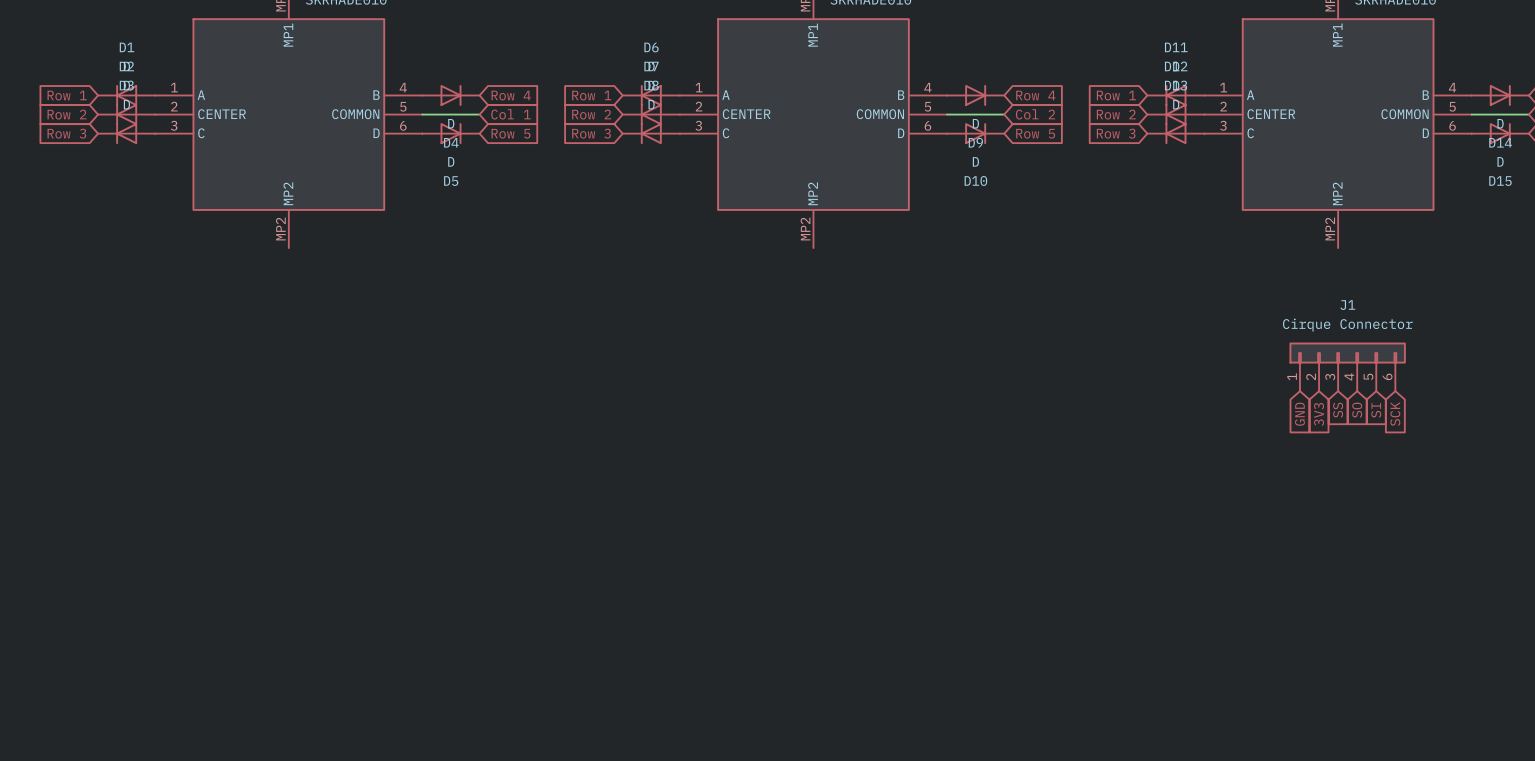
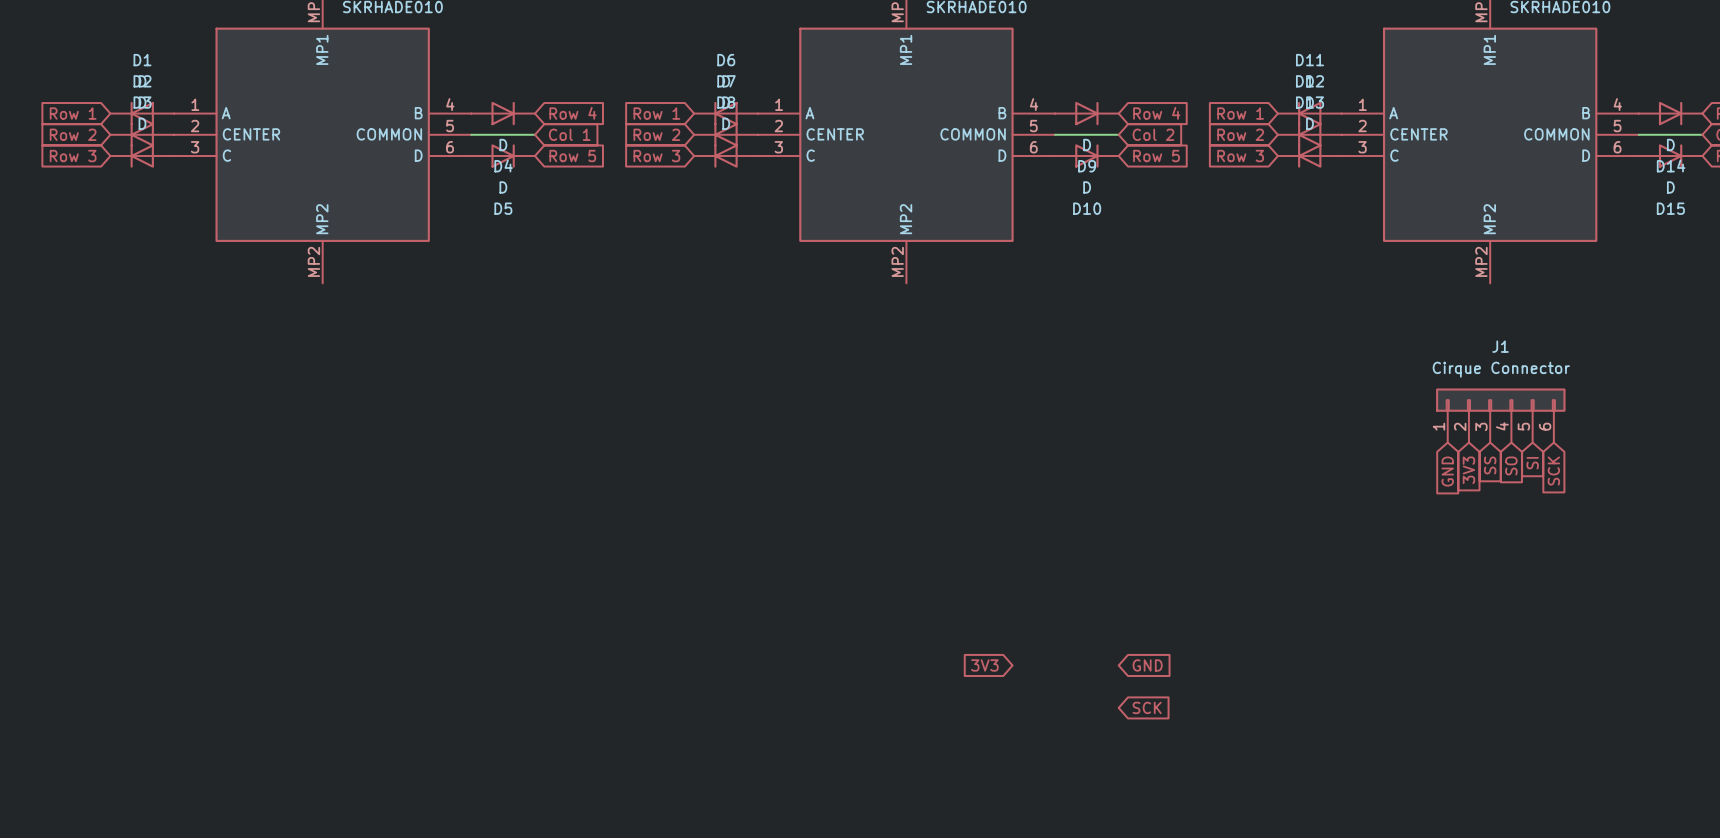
global label: none -> 3V3 (984, 665)
global label: none -> GND (1147, 665)
global label: none -> SCK (1147, 707)

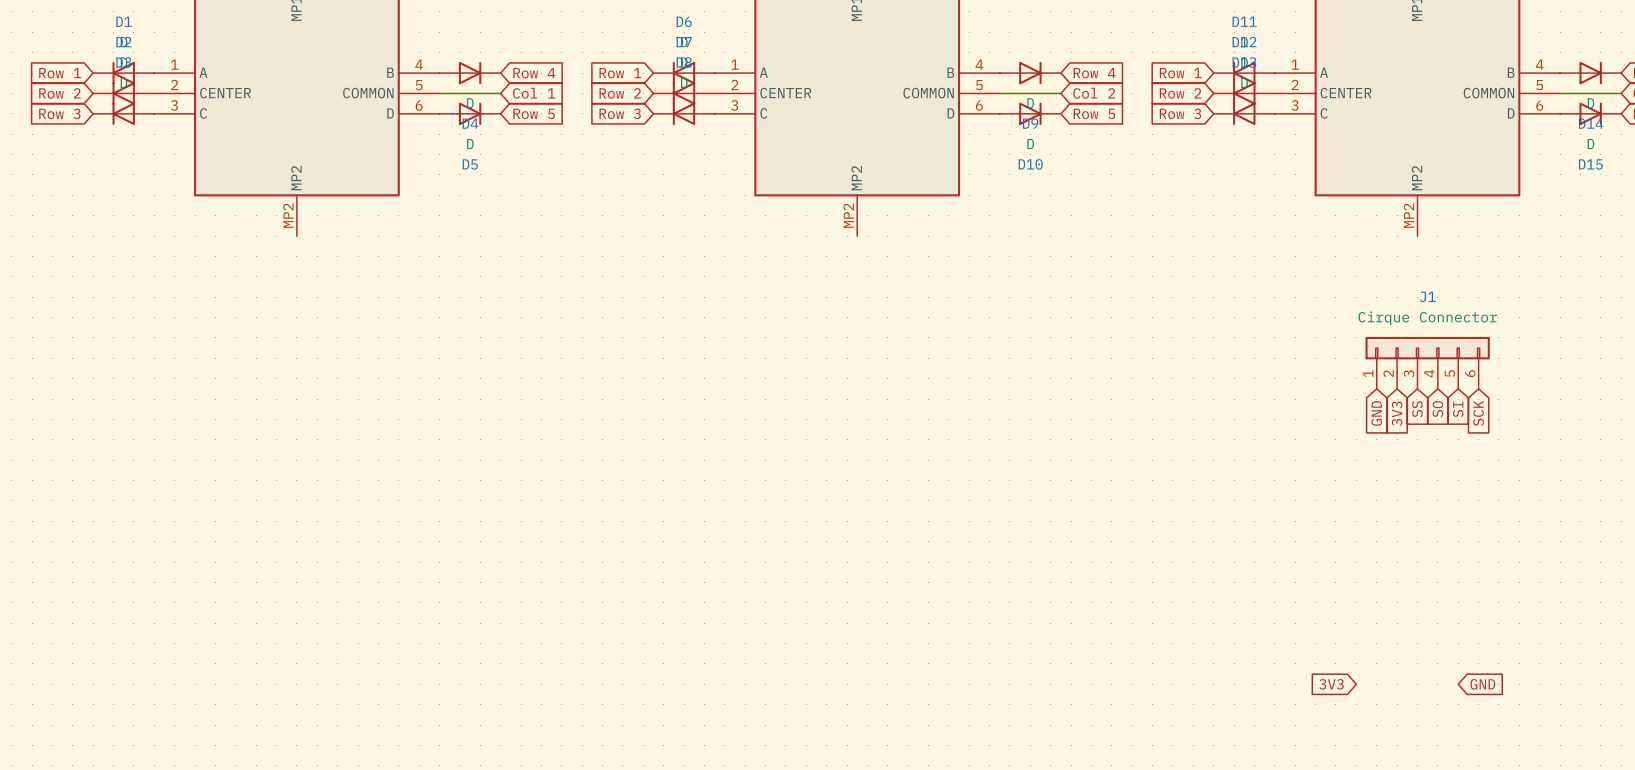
global label: 3V3 (984, 665) -> none
global label: GND (1147, 665) -> none
global label: SCK (1147, 707) -> none
global label: none -> 3V3 (1331, 684)
global label: none -> GND (1482, 684)

